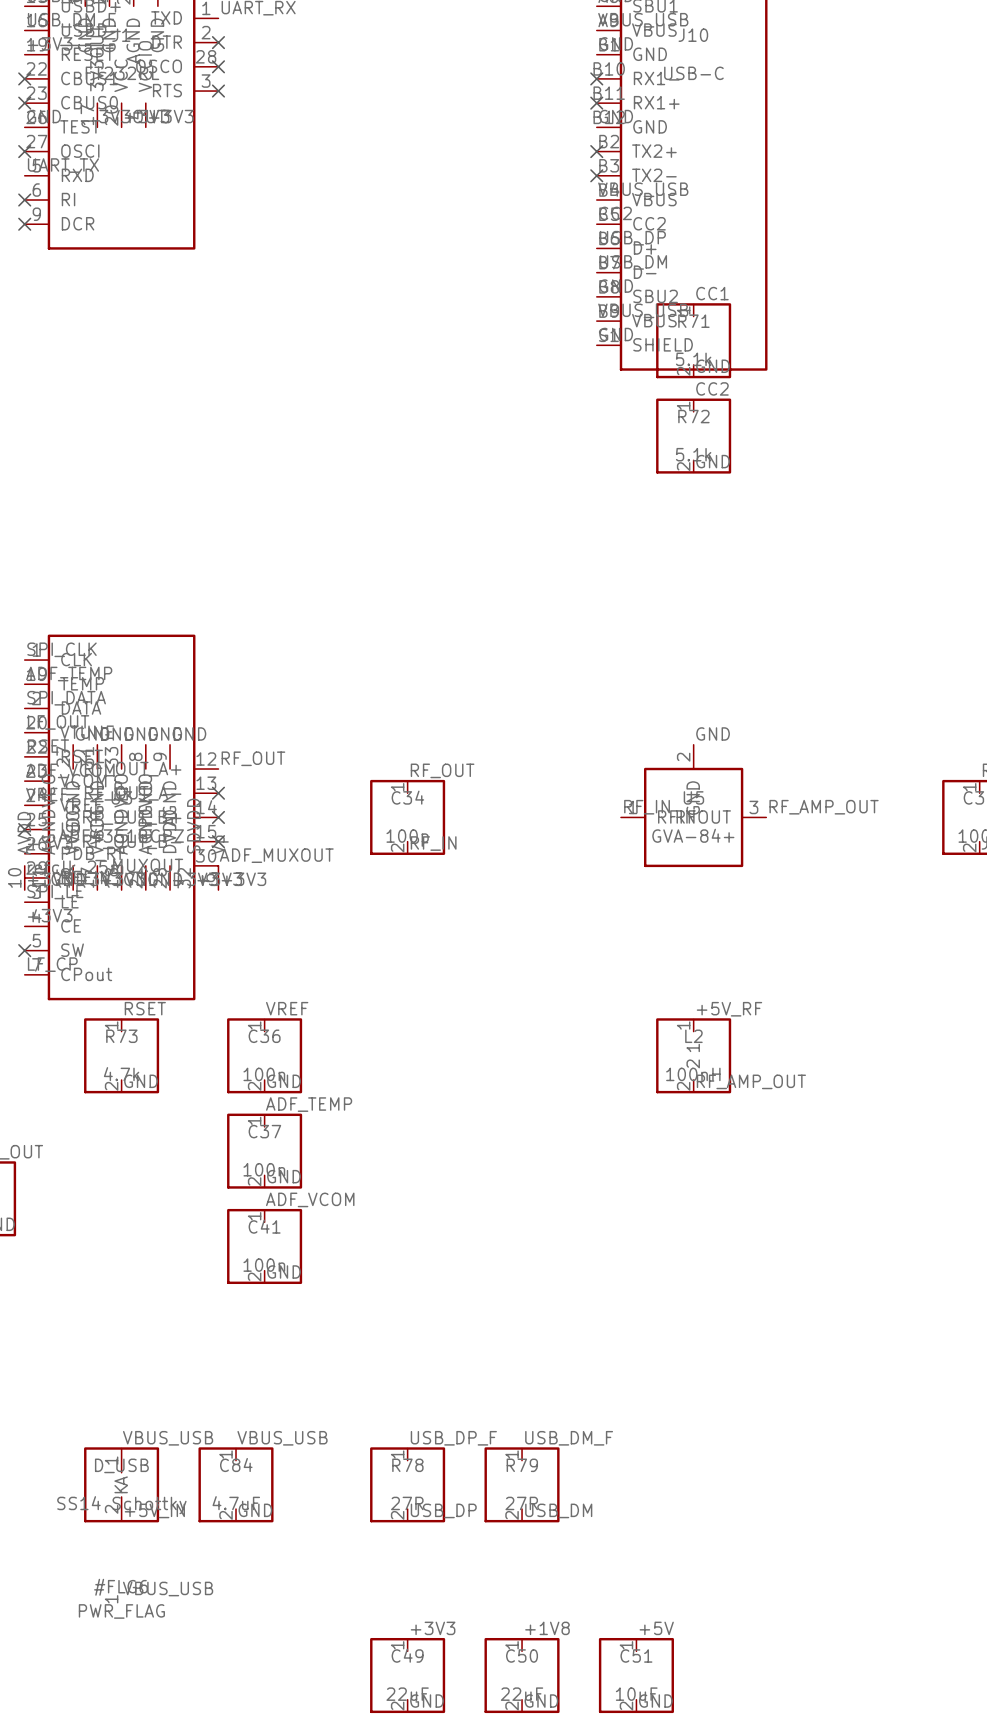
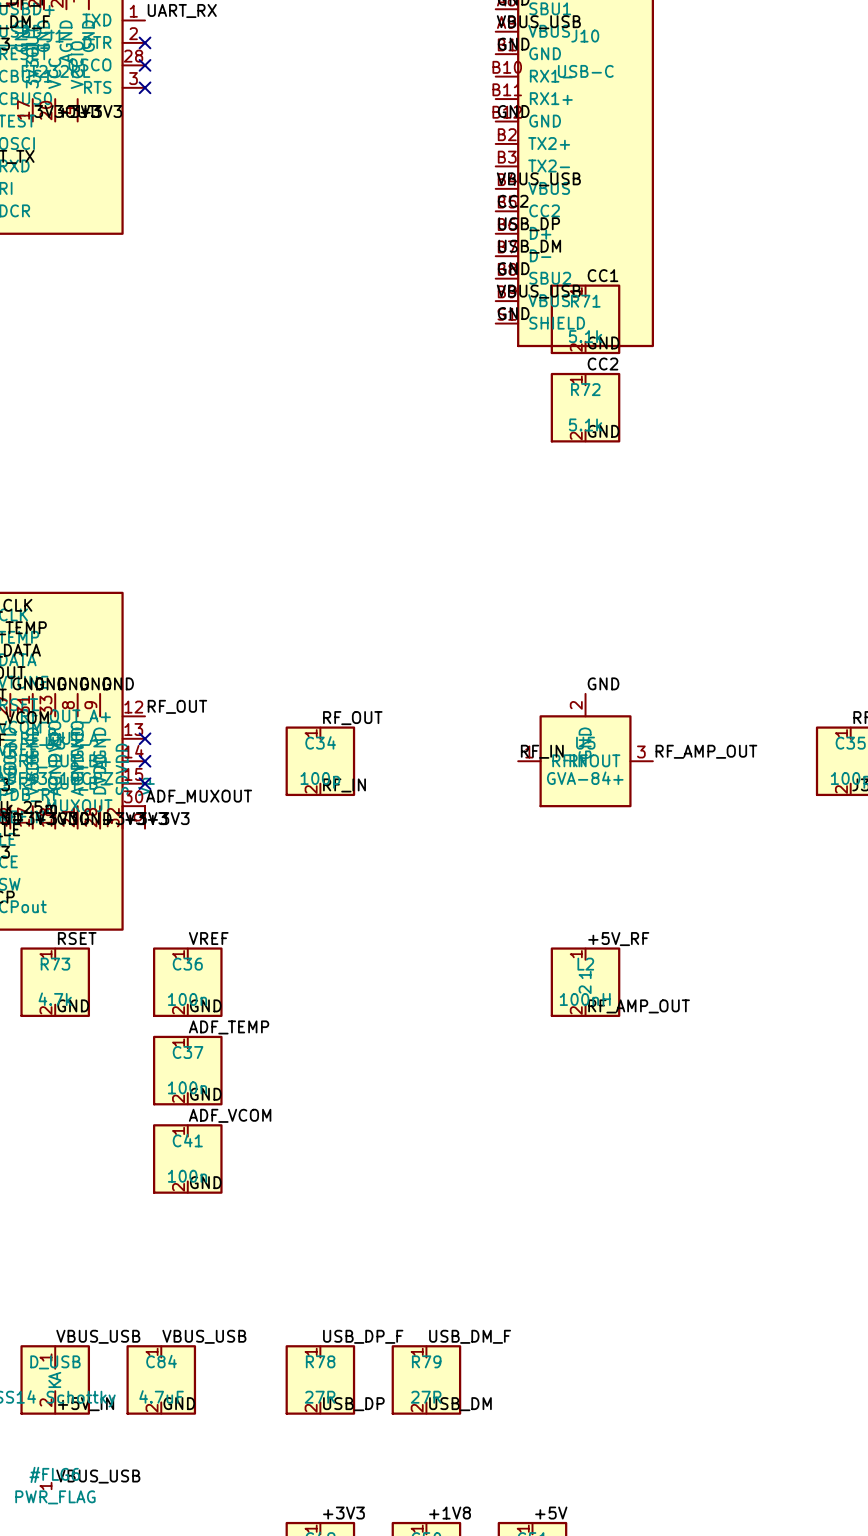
no-connect mark: (596, 78) -> none
no-connect mark: (596, 103) -> none
no-connect mark: (596, 151) -> none
no-connect mark: (596, 175) -> none

